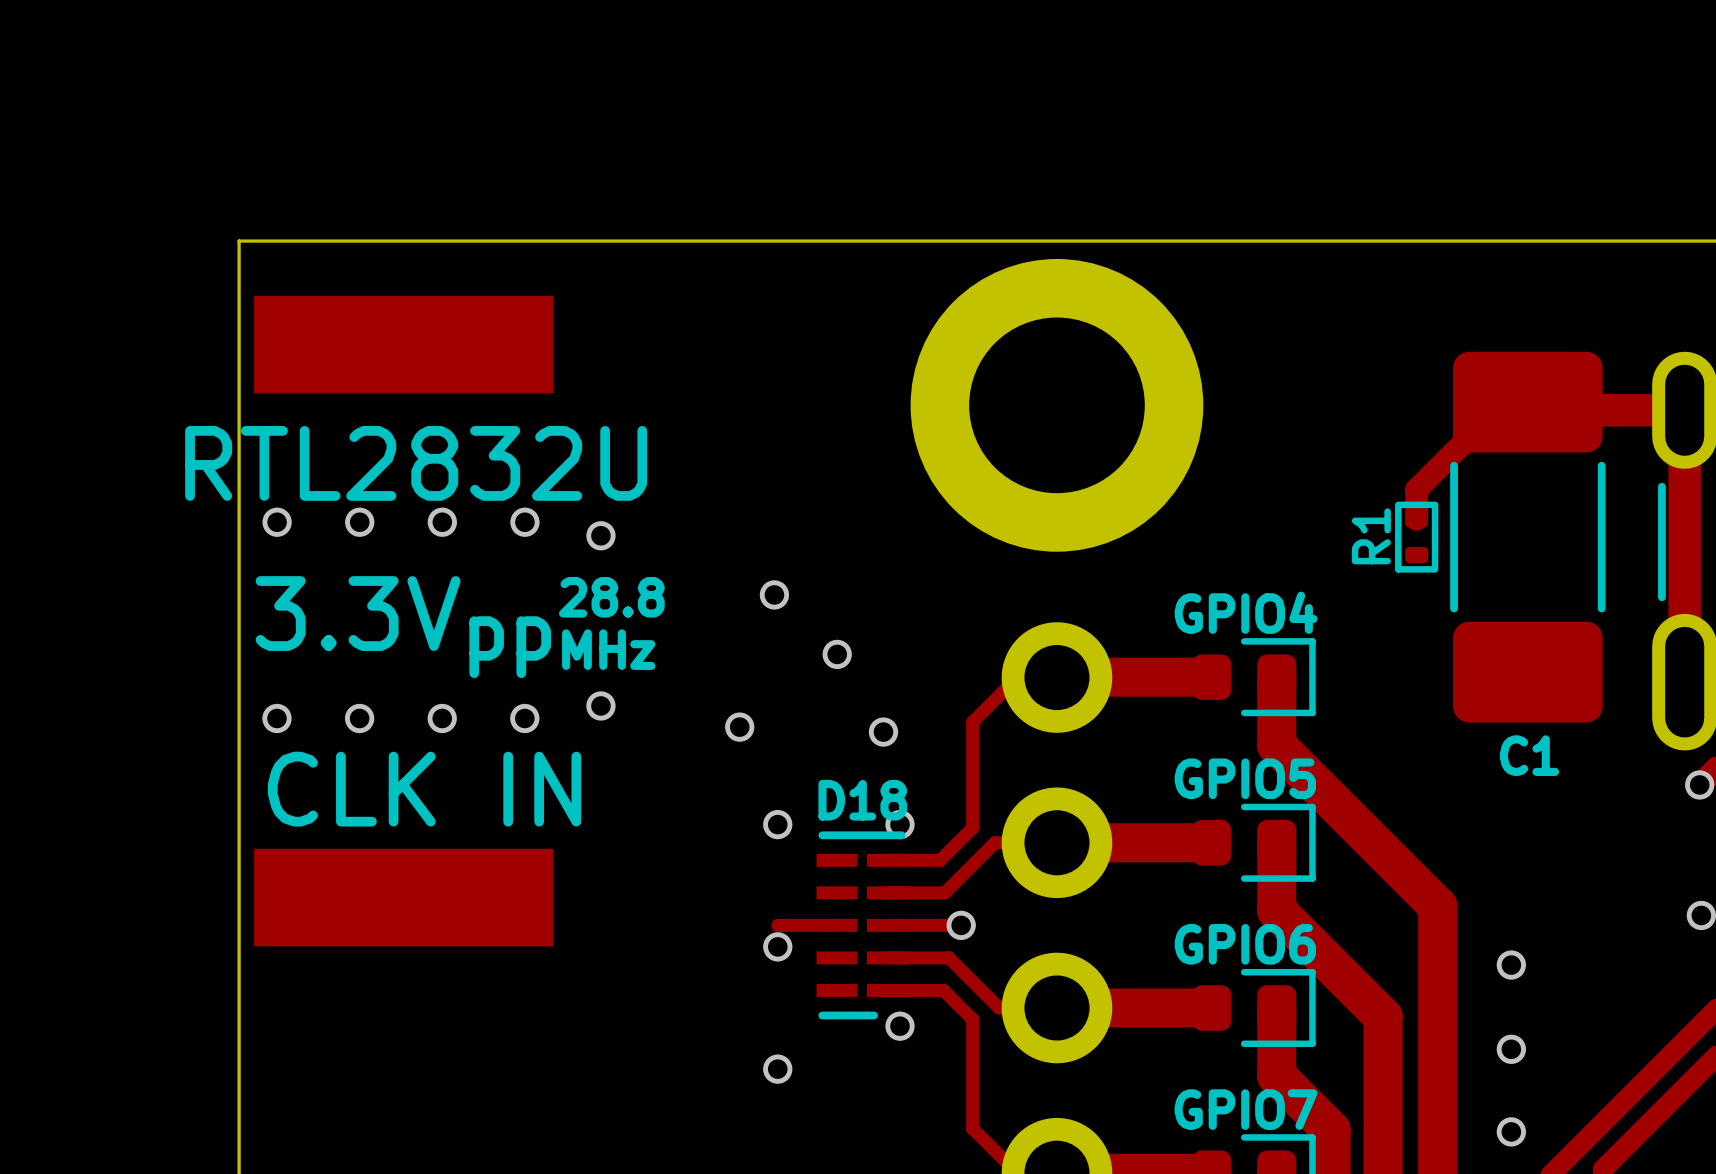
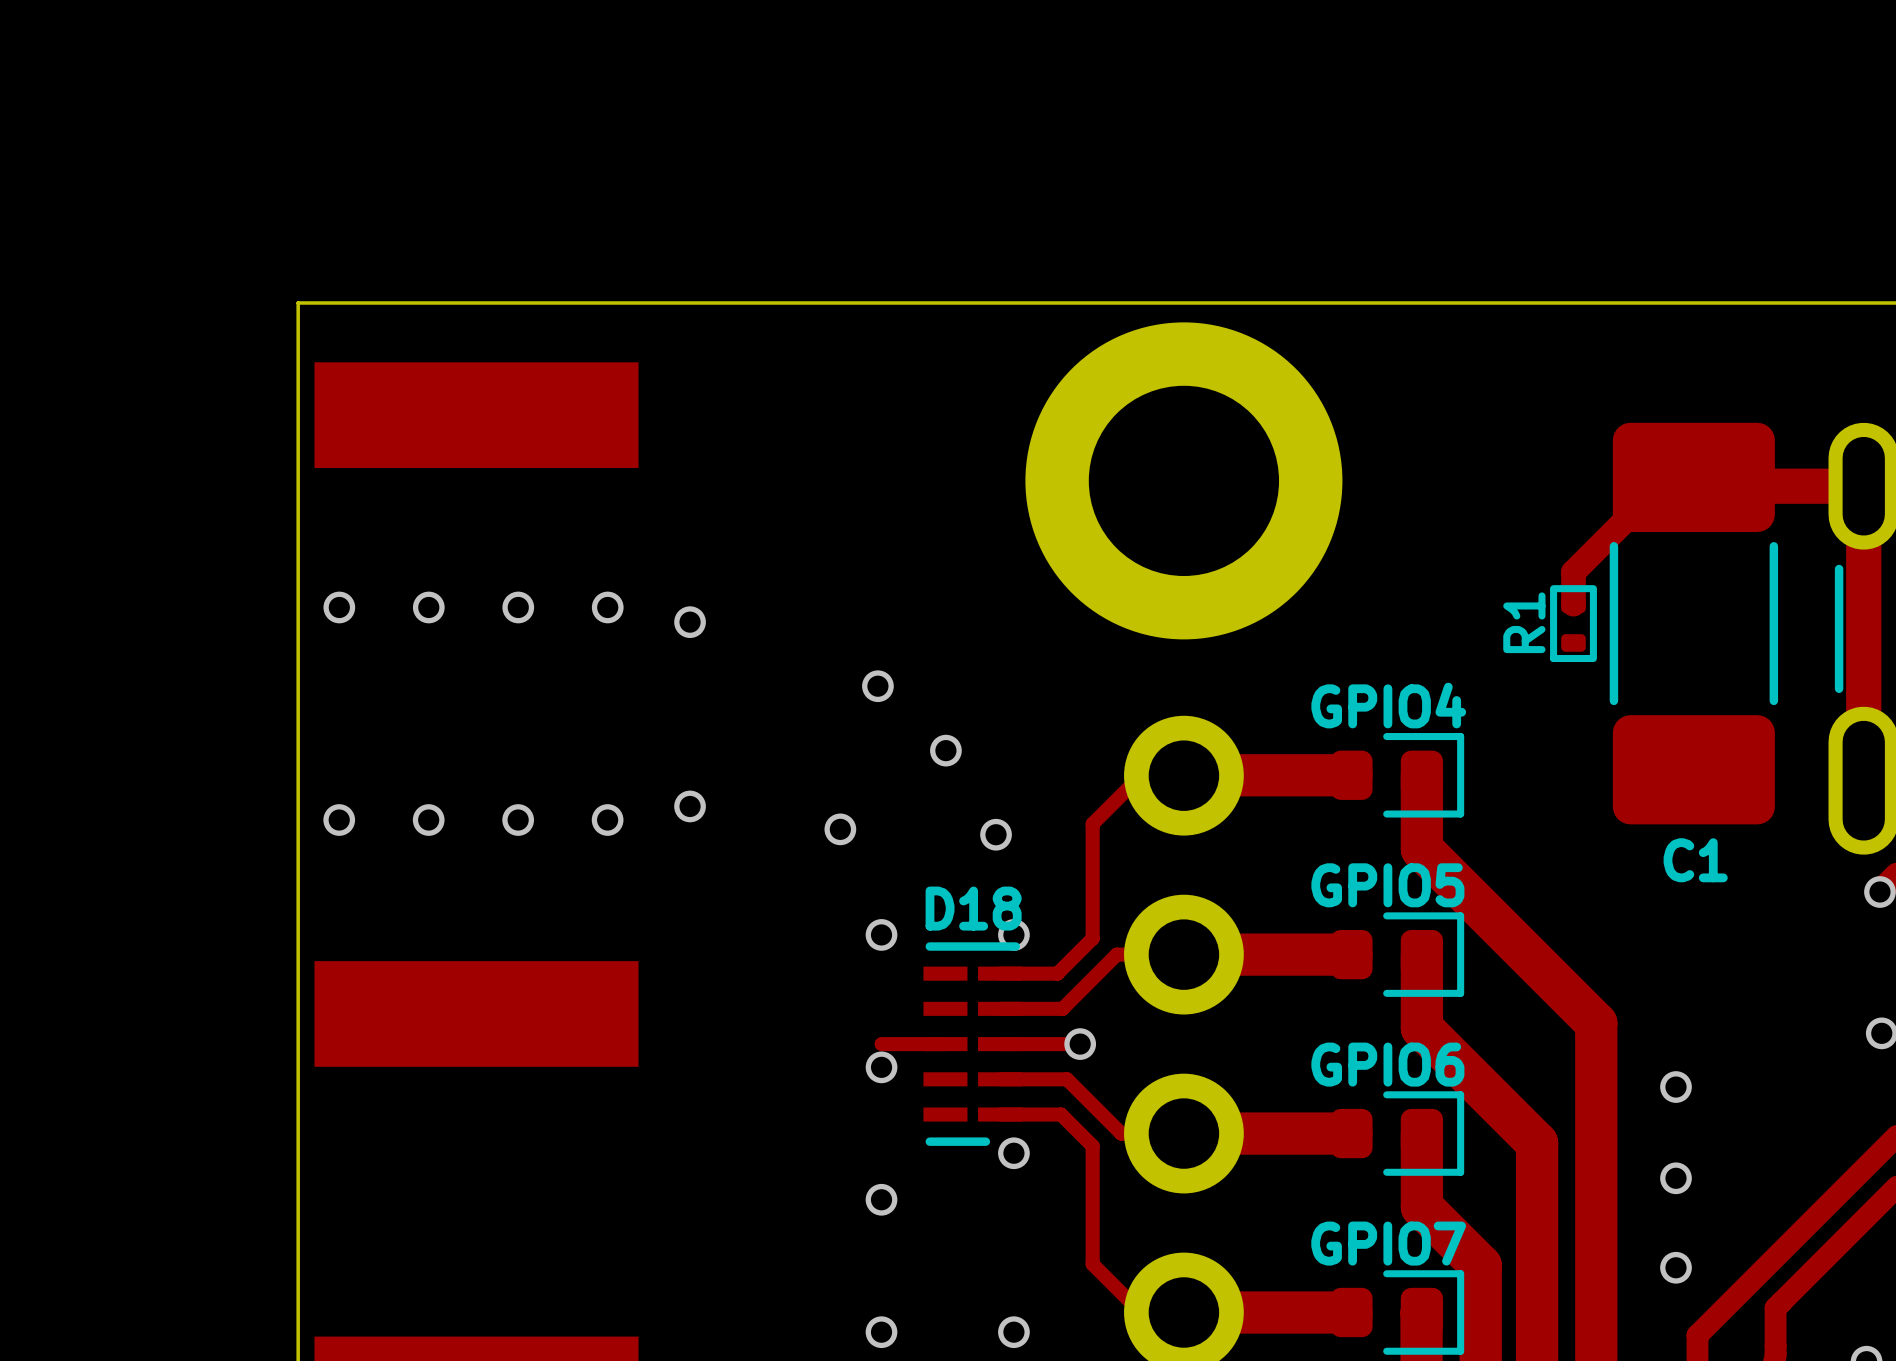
text: RTL2832U (416, 463) -> none
text: 28.8 (611, 597) -> none
text: 3.3Vpp (403, 627) -> none
text: MHz (608, 649) -> none
text: CLK IN (424, 789) -> none

